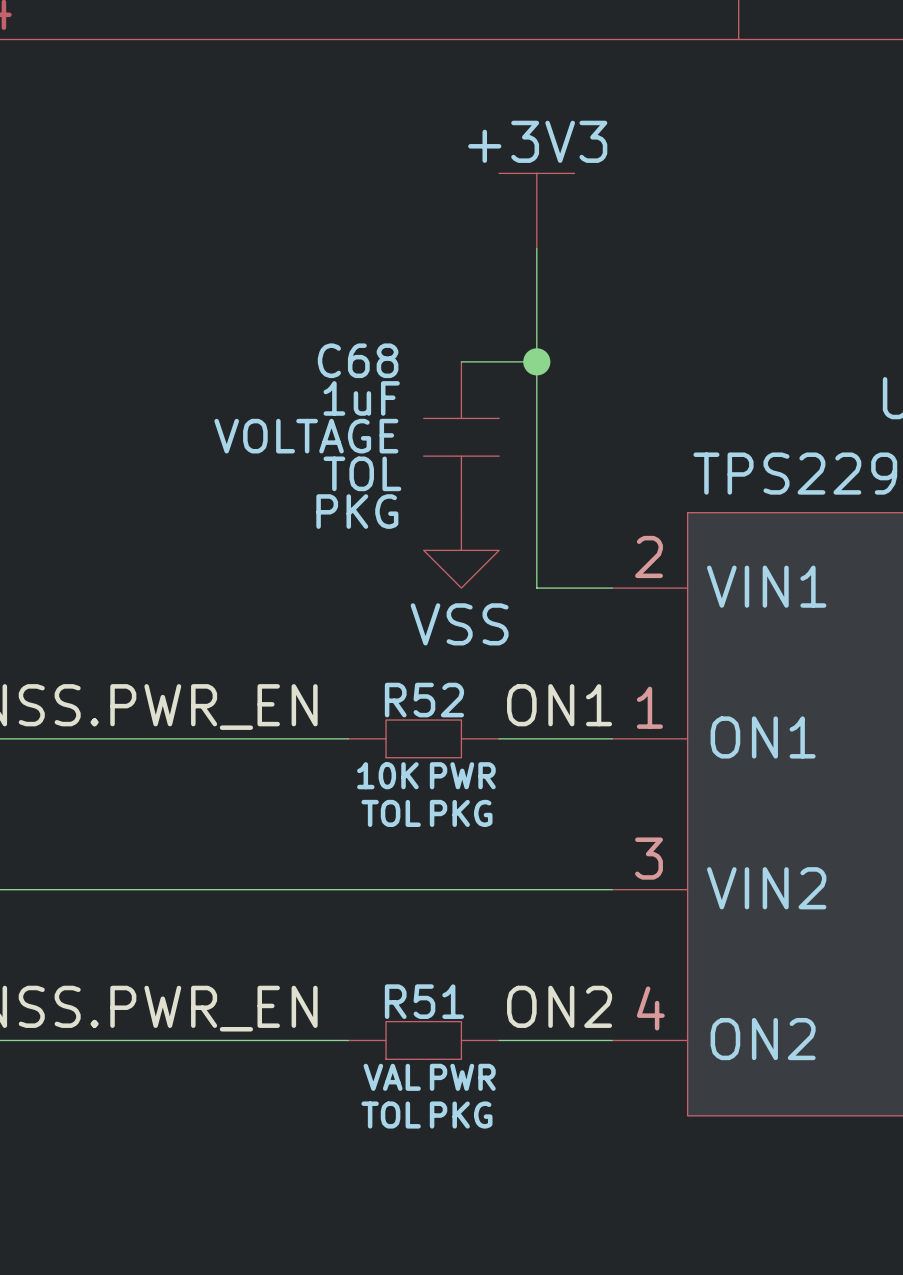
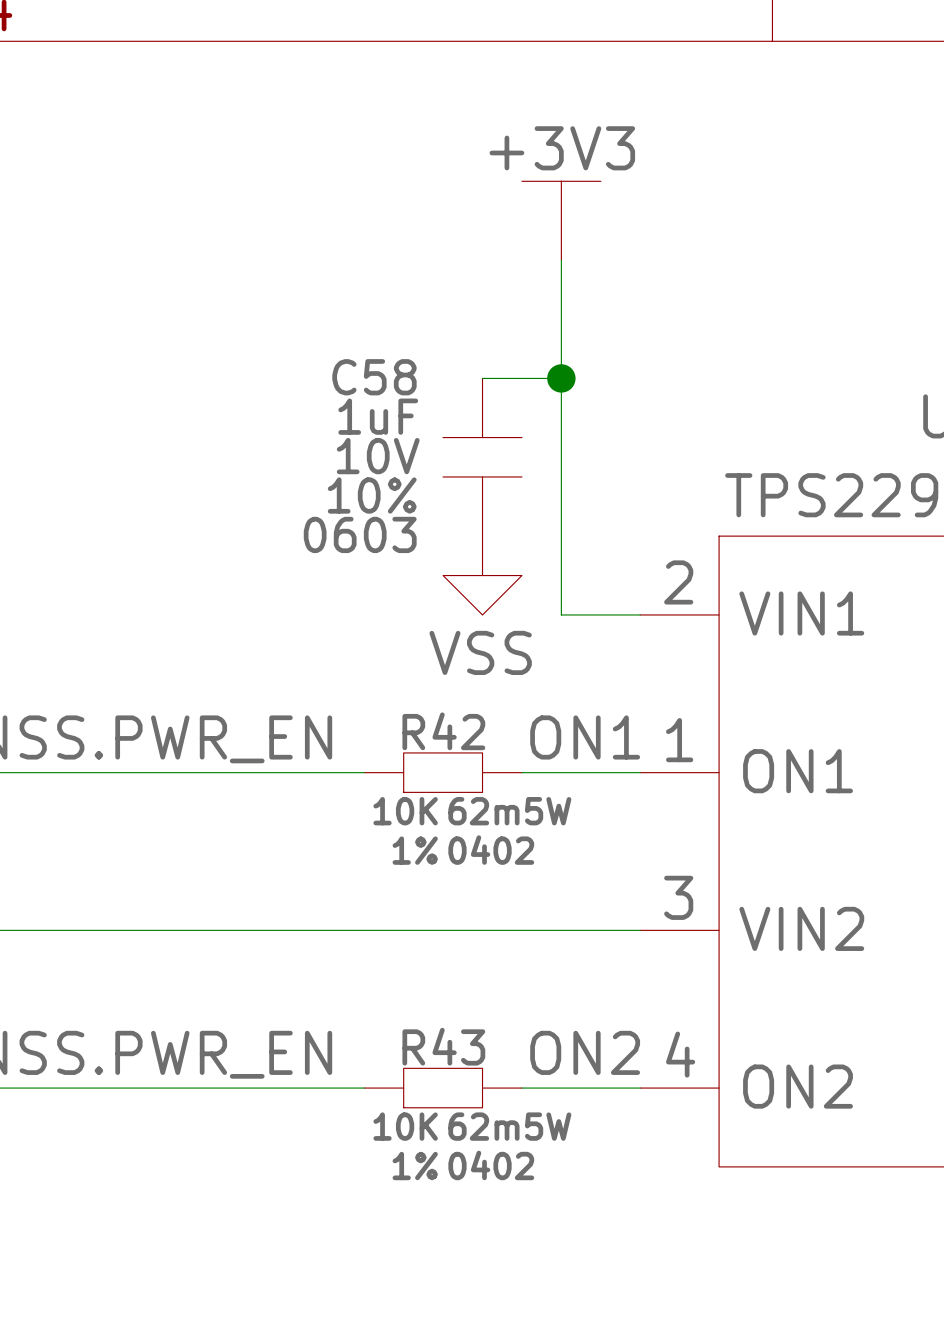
C68 name: C68 (358, 360) -> C58 (374, 377)
C68 text: VOLTAGE (306, 436) -> 10V (378, 456)
C68 text: TOL (362, 473) -> 10% (372, 495)
C68 text: PKG (357, 511) -> 0603 (360, 534)
R52 name: R52 (424, 700) -> R42 (443, 731)
R52 text: PWR (462, 775) -> 62m5W (509, 811)
R52 text: TOL (391, 813) -> 1% (415, 850)
R52 text: PKG (461, 813) -> 0402 (491, 850)
R51 name: R51 (424, 1001) -> R43 (443, 1046)
R51 value: VAL (392, 1077) -> 10K (405, 1126)
R51 text: PWR (462, 1077) -> 62m5W (509, 1126)
R51 text: TOL (391, 1115) -> 1% (415, 1166)
R51 text: PKG (461, 1115) -> 0402 (491, 1165)

